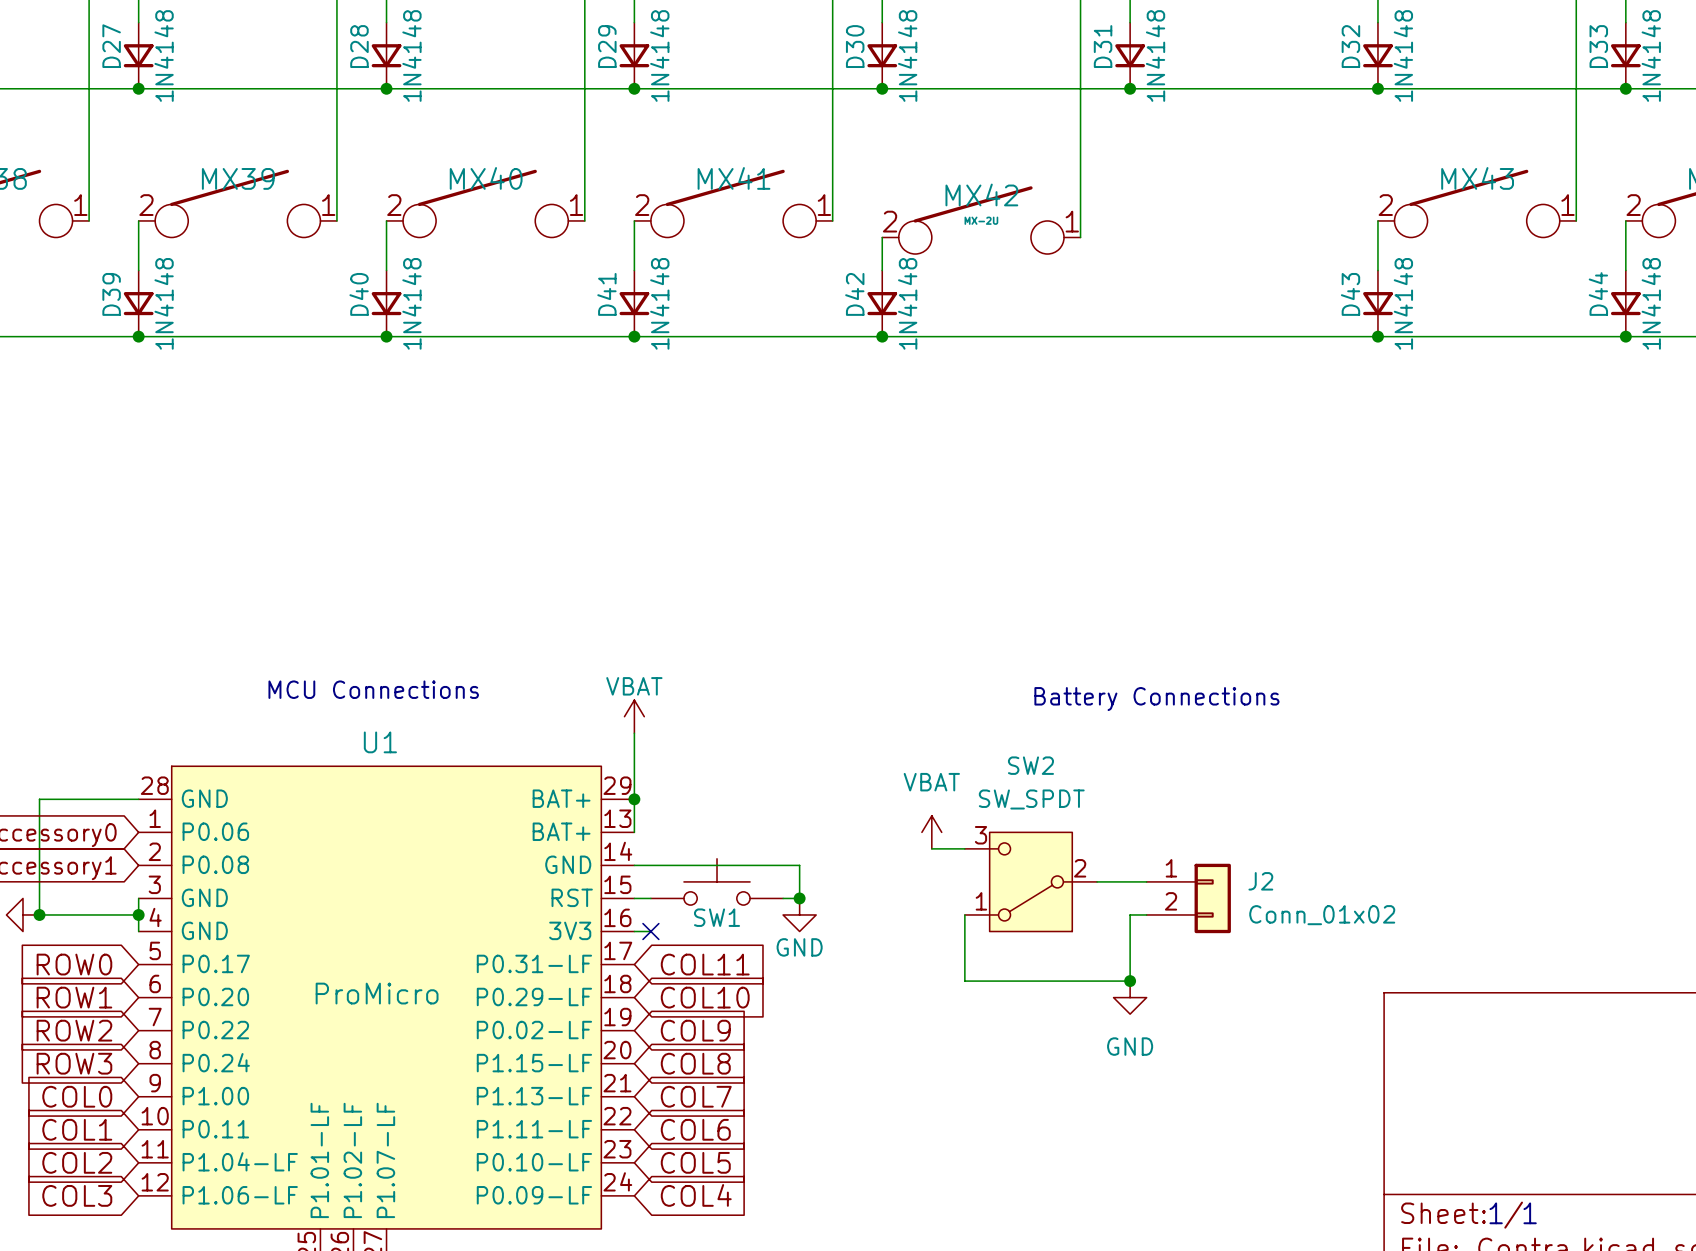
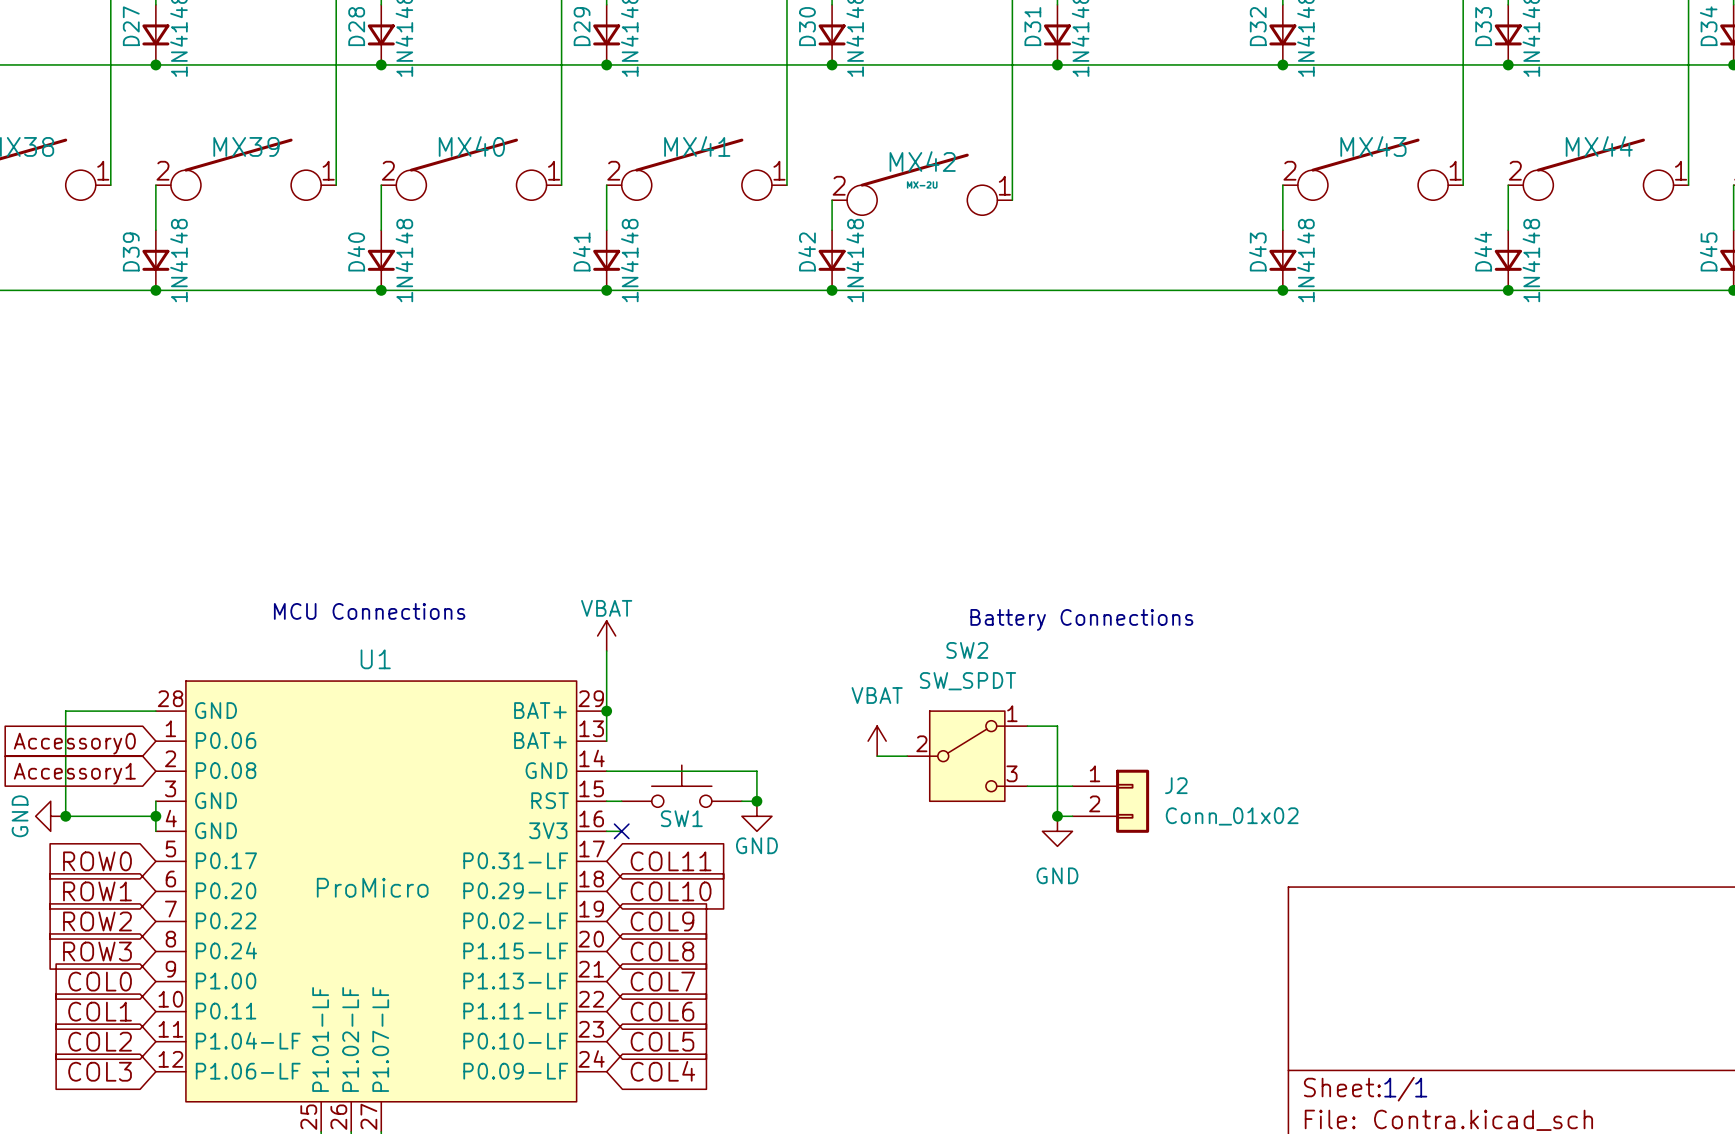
SW2 rotation: 0° (1030, 881) -> 180° (967, 756)
wire: (964, 914) (964, 981) (1130, 981) (1130, 914) -> (1027, 726) (1057, 726) (1057, 816)
junction position: (1130, 981) -> (1057, 816)
power symbol position: GND (1130, 997) -> GND (1057, 831)

